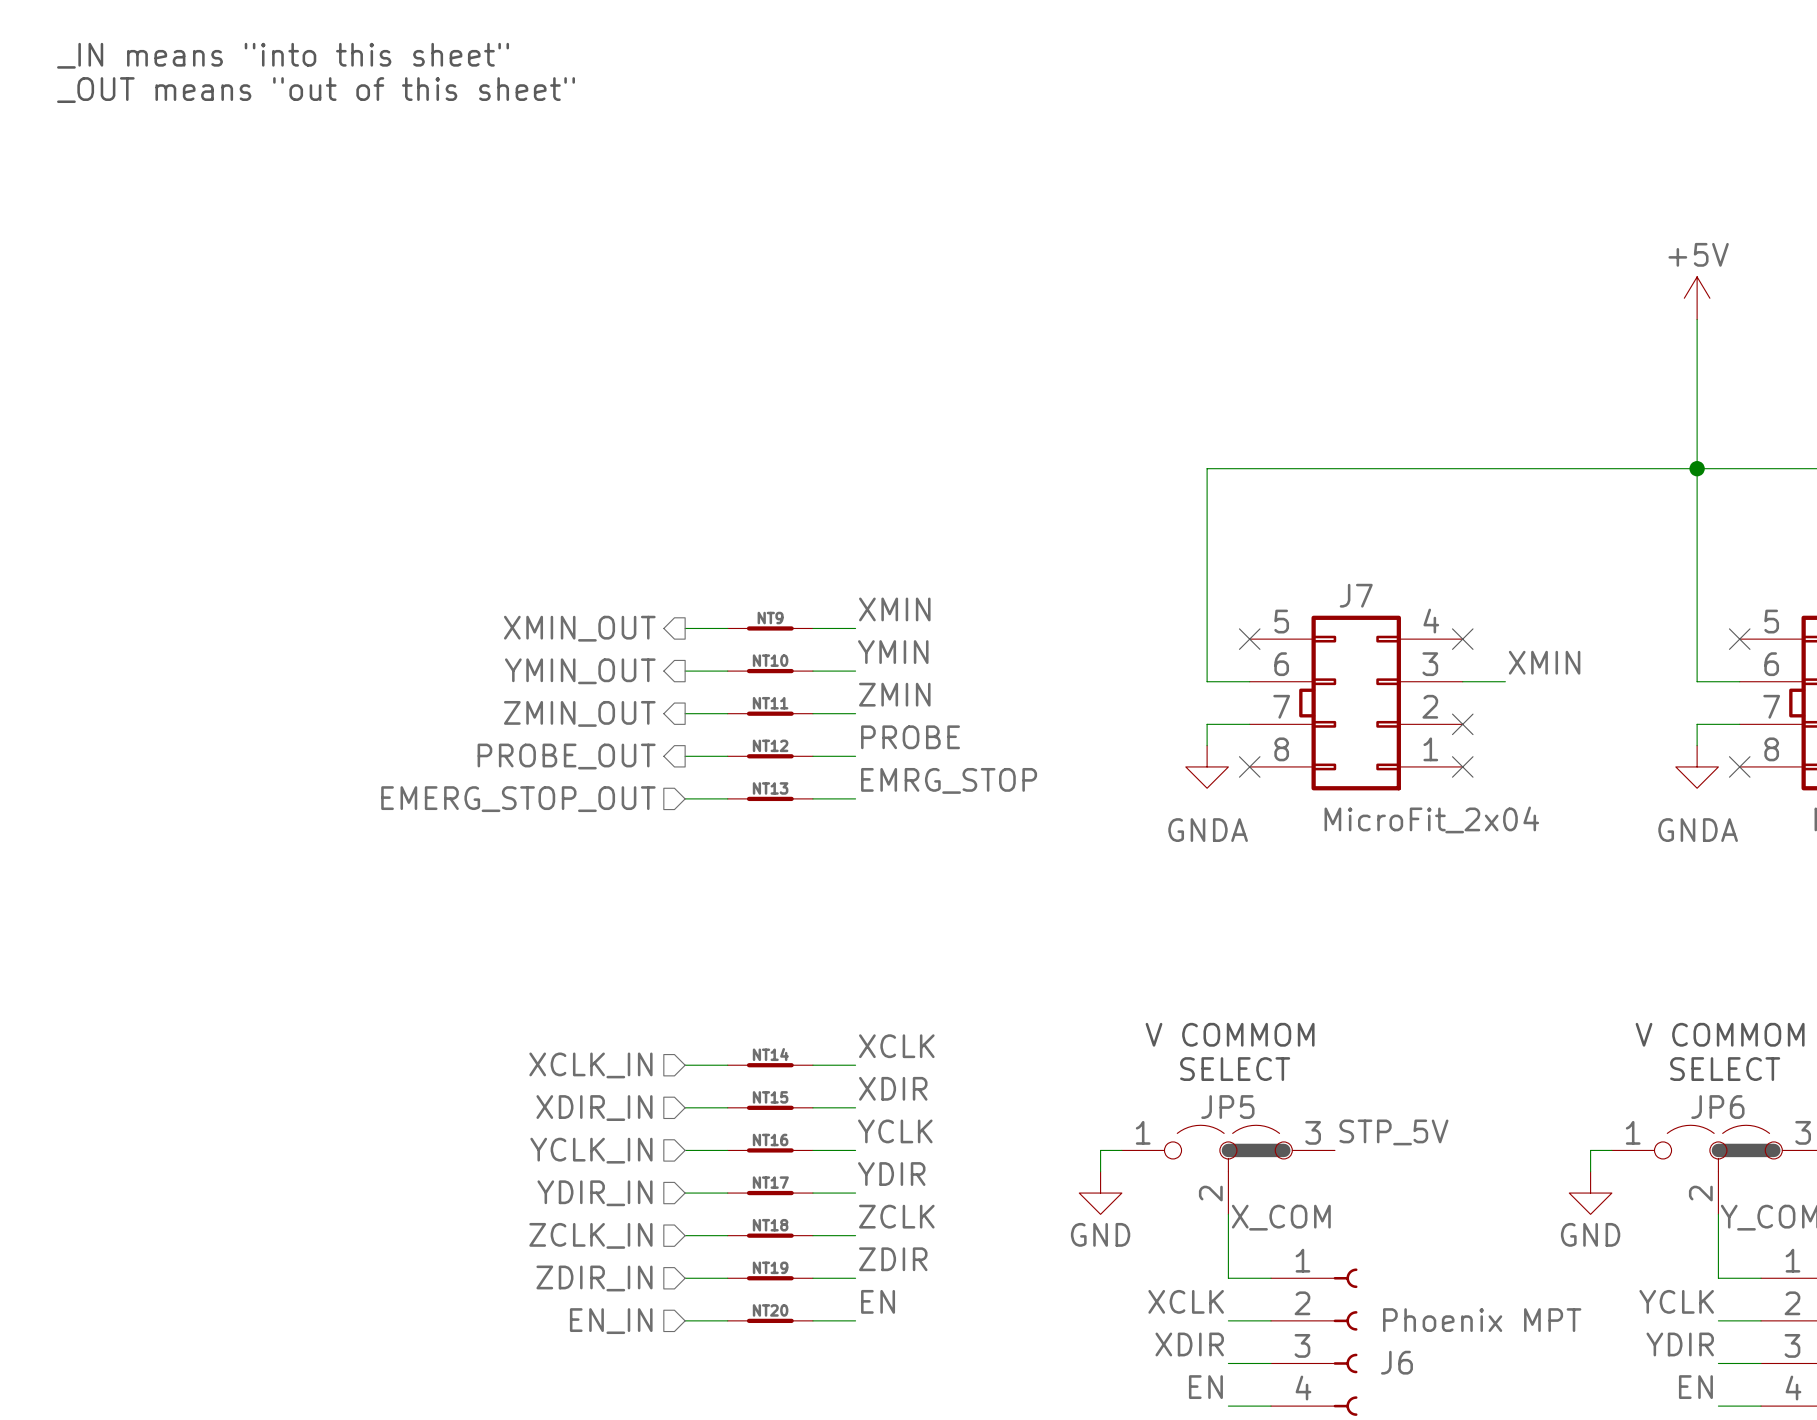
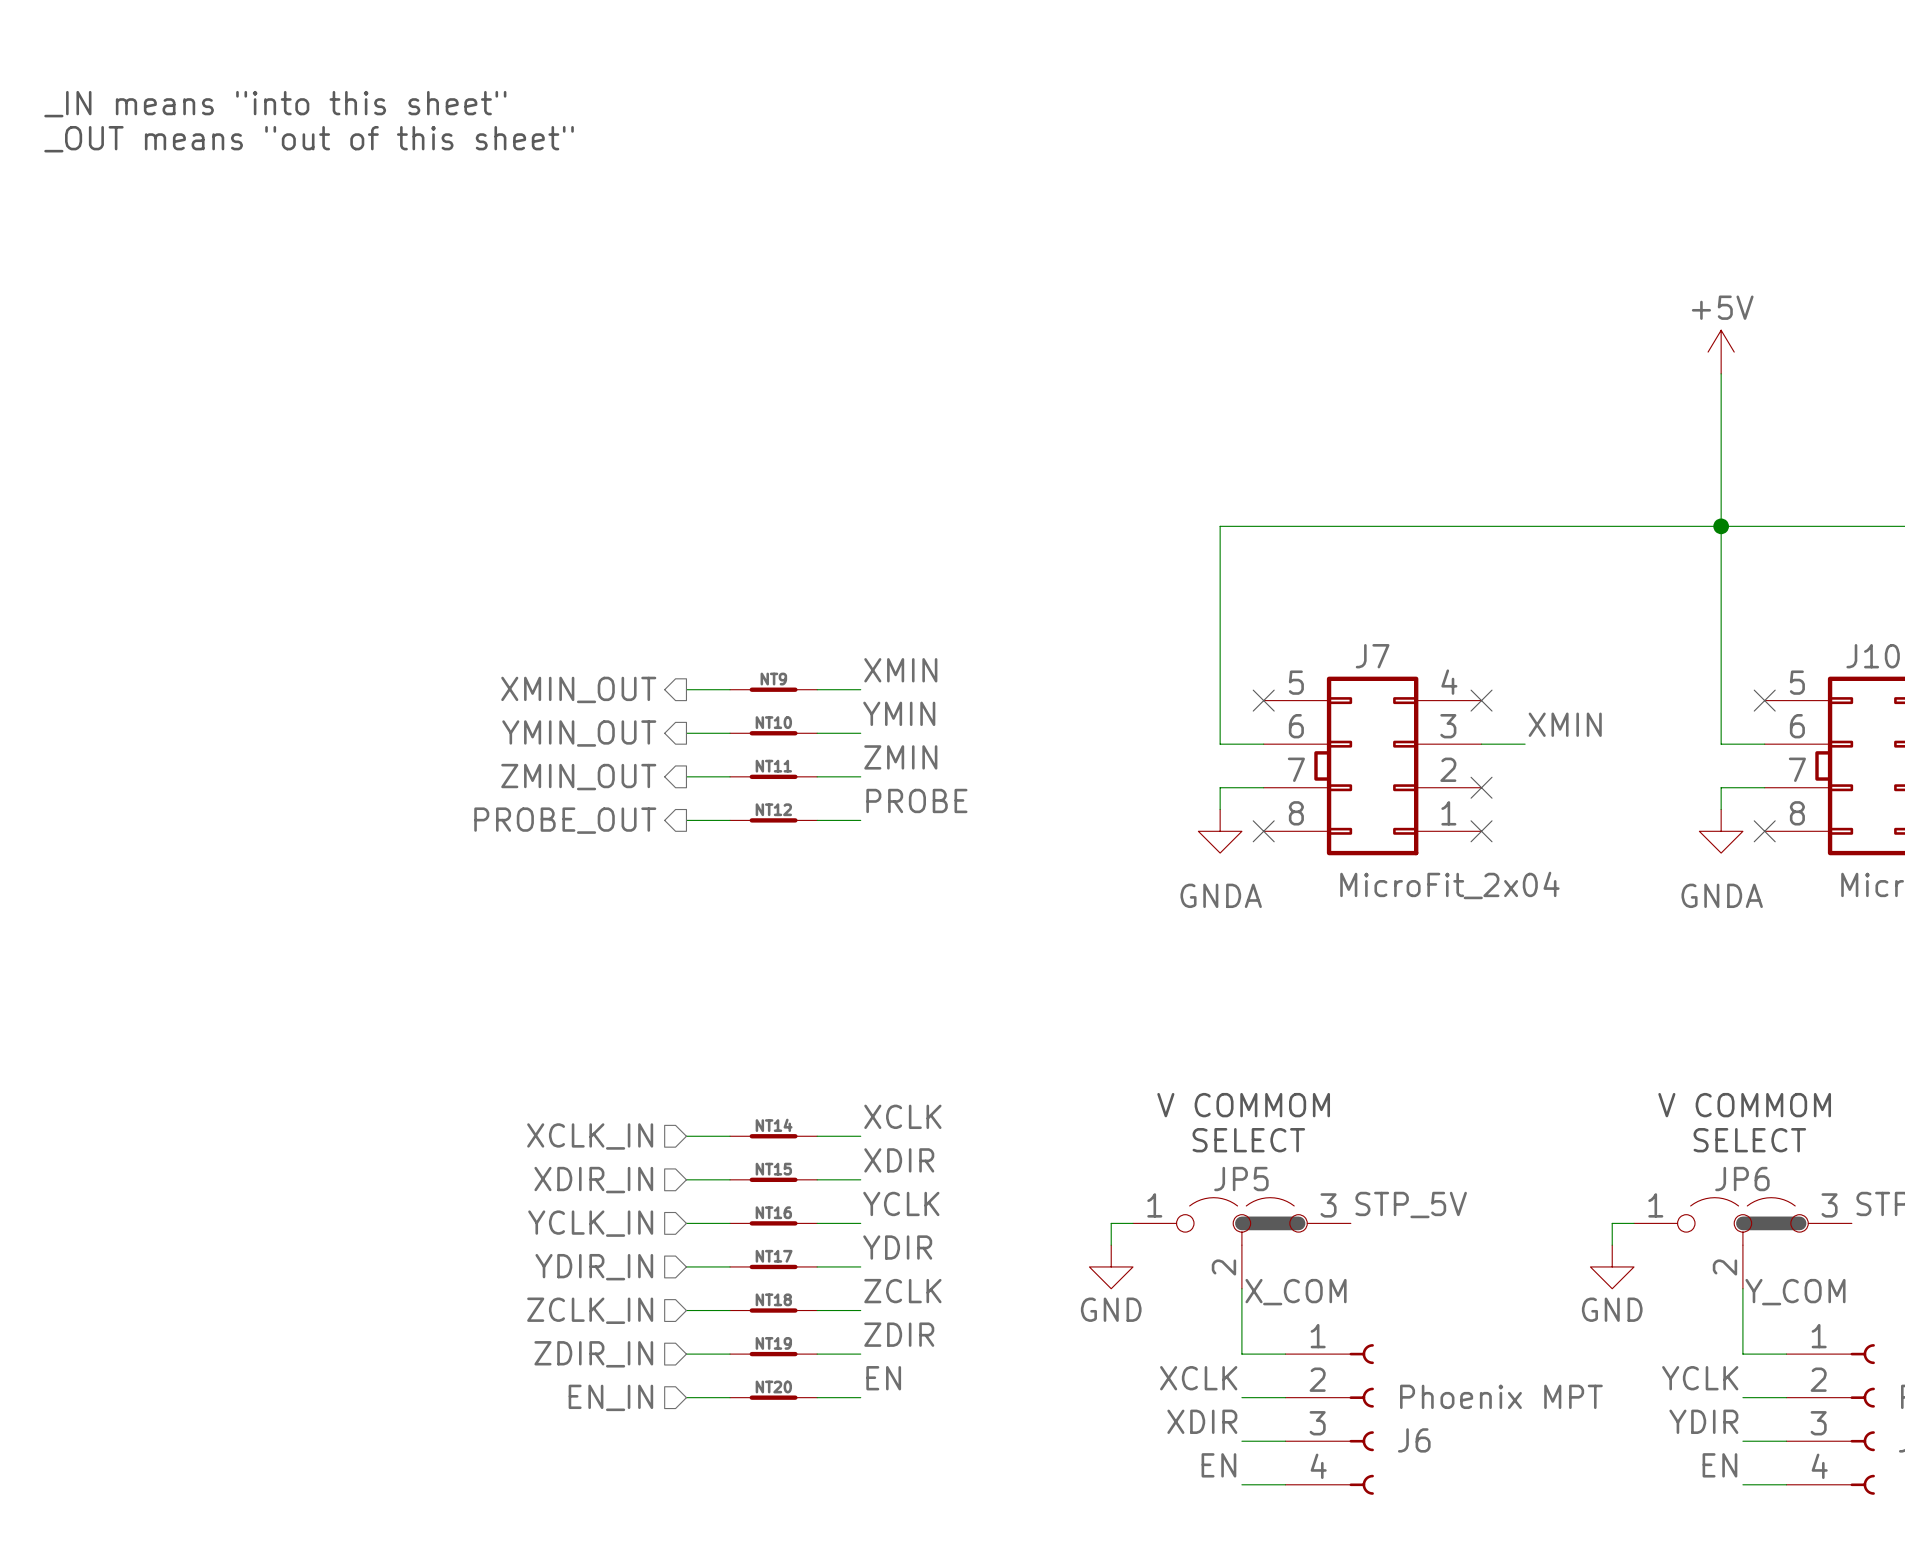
label: EMRG_STOP (949, 780) -> none
wire: (685, 798) (727, 798) -> none
NT13: (770, 798) -> none
wire: (812, 798) (855, 798) -> none
hierarchical label: EMERG_STOP_OUT (518, 799) -> none

